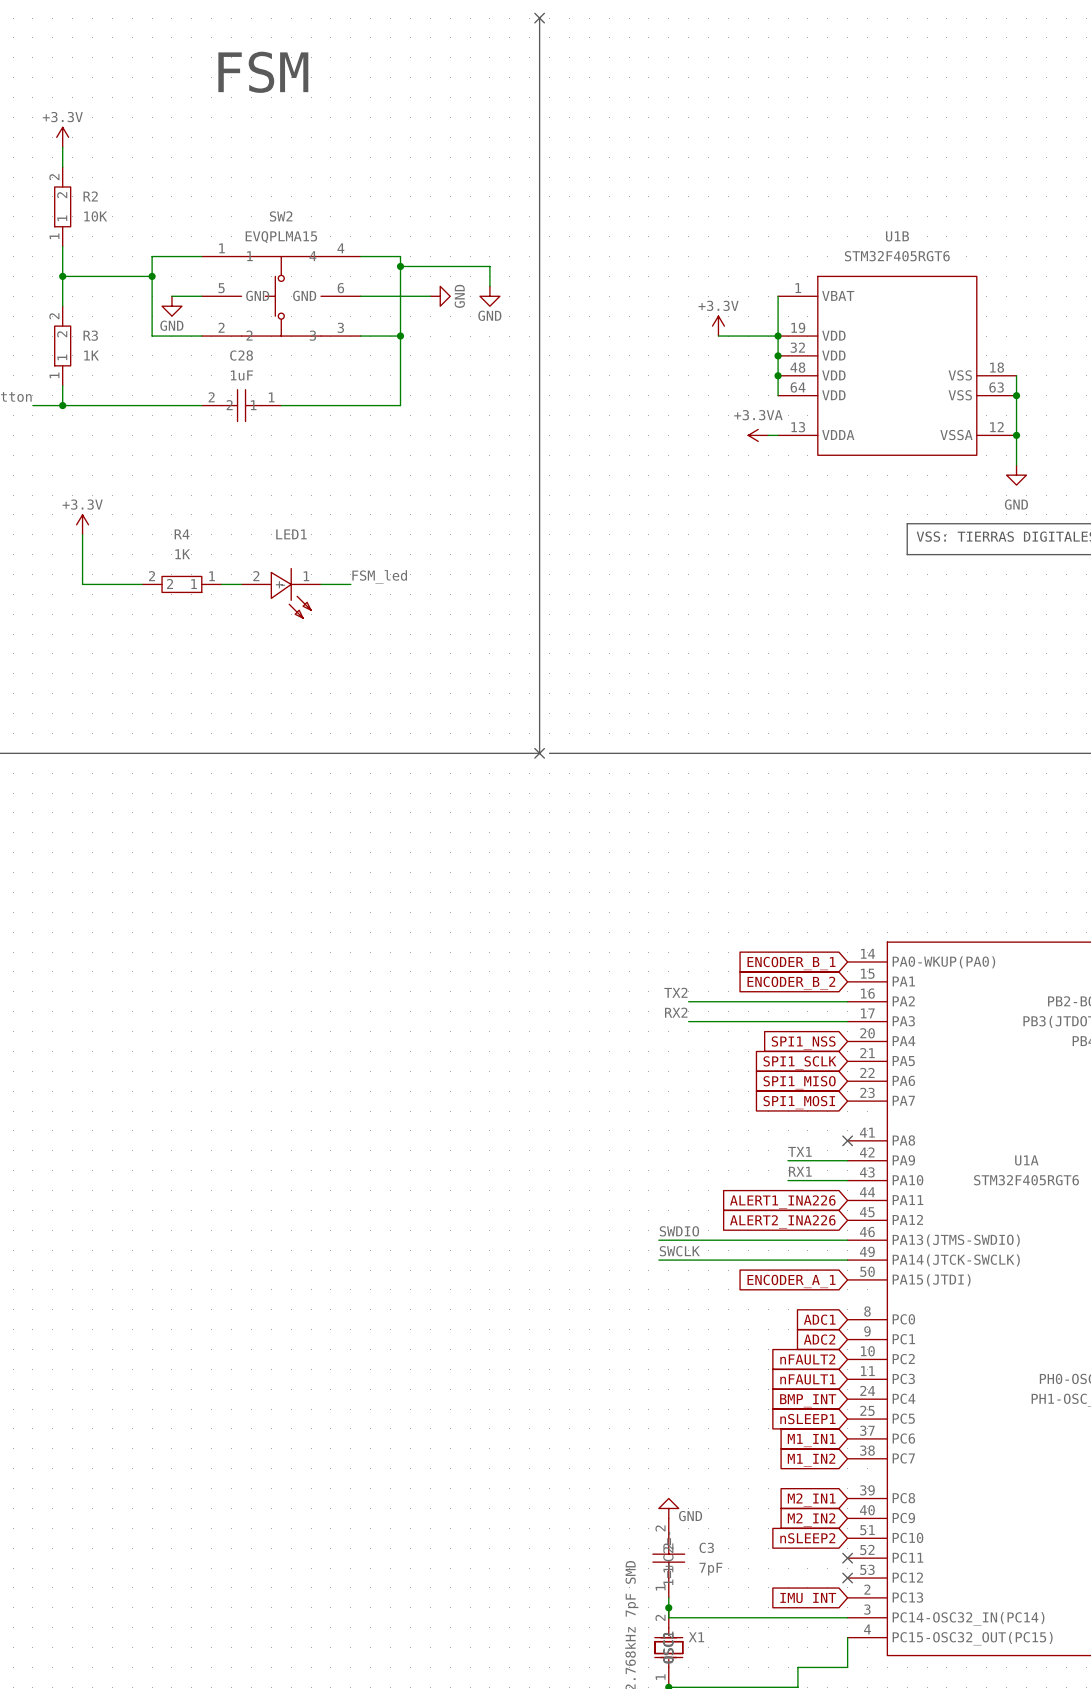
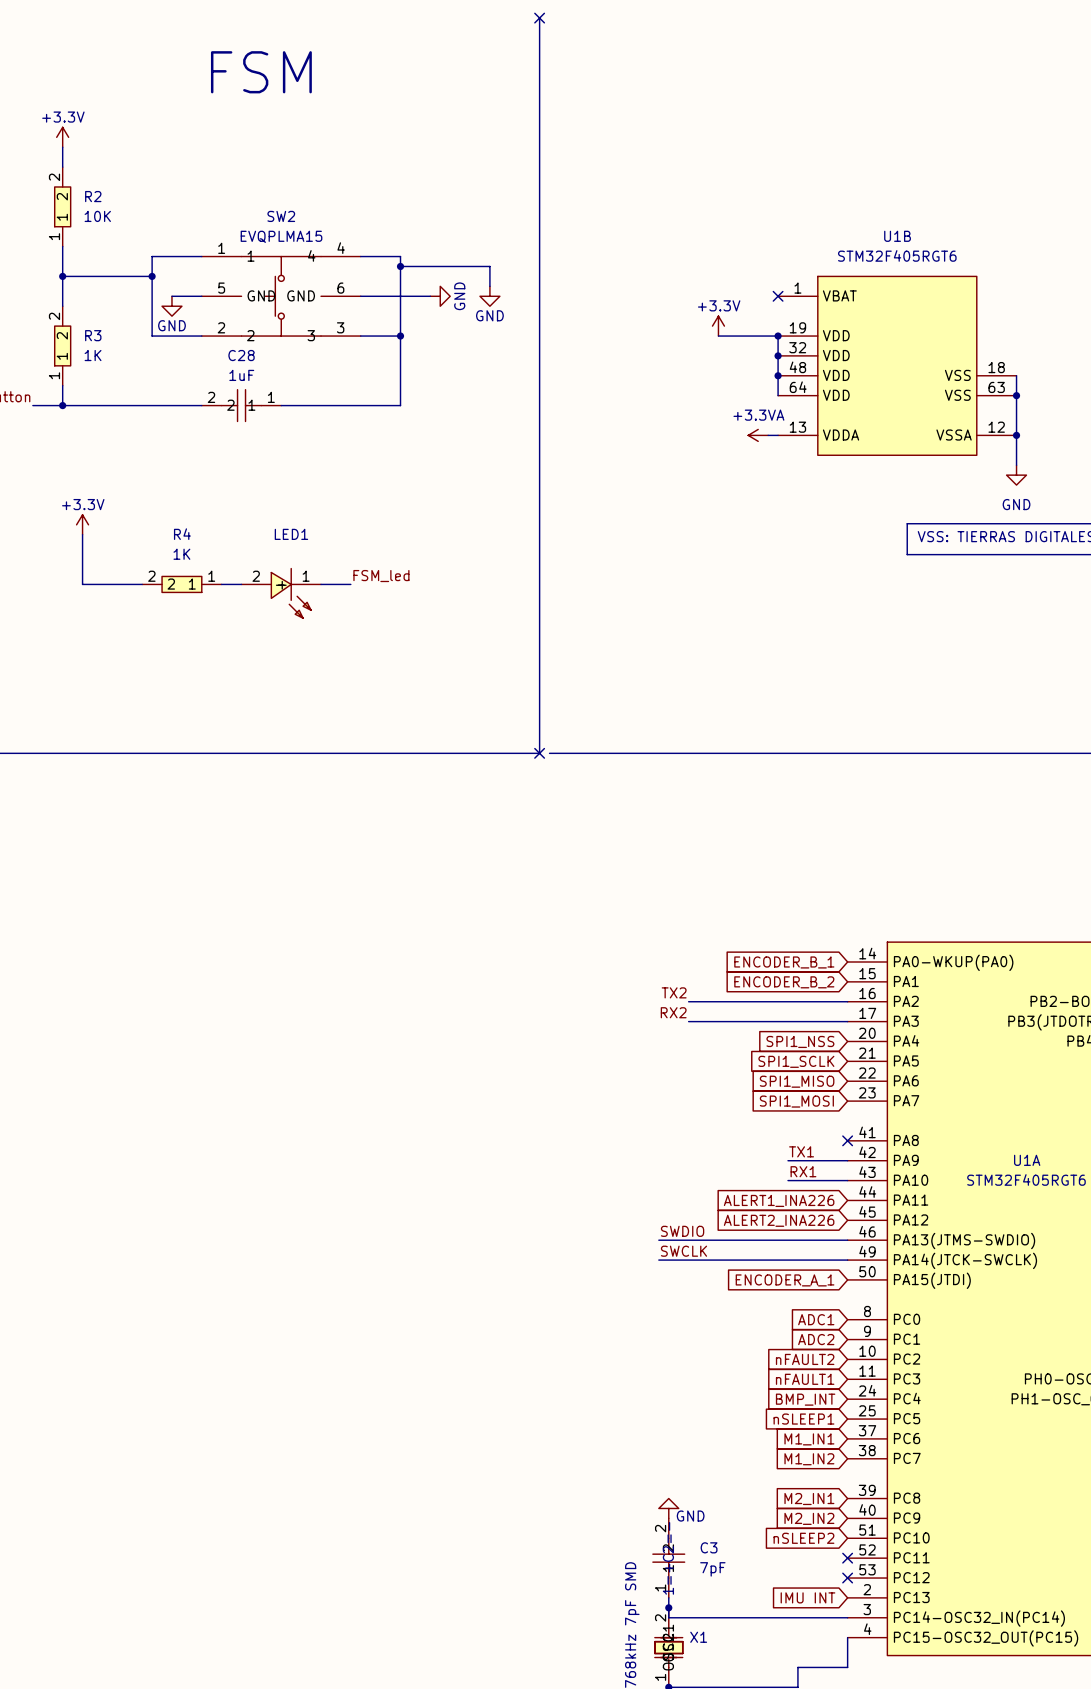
wire: (778, 296) (778, 336) -> none
no-connect mark: none -> (778, 296)

